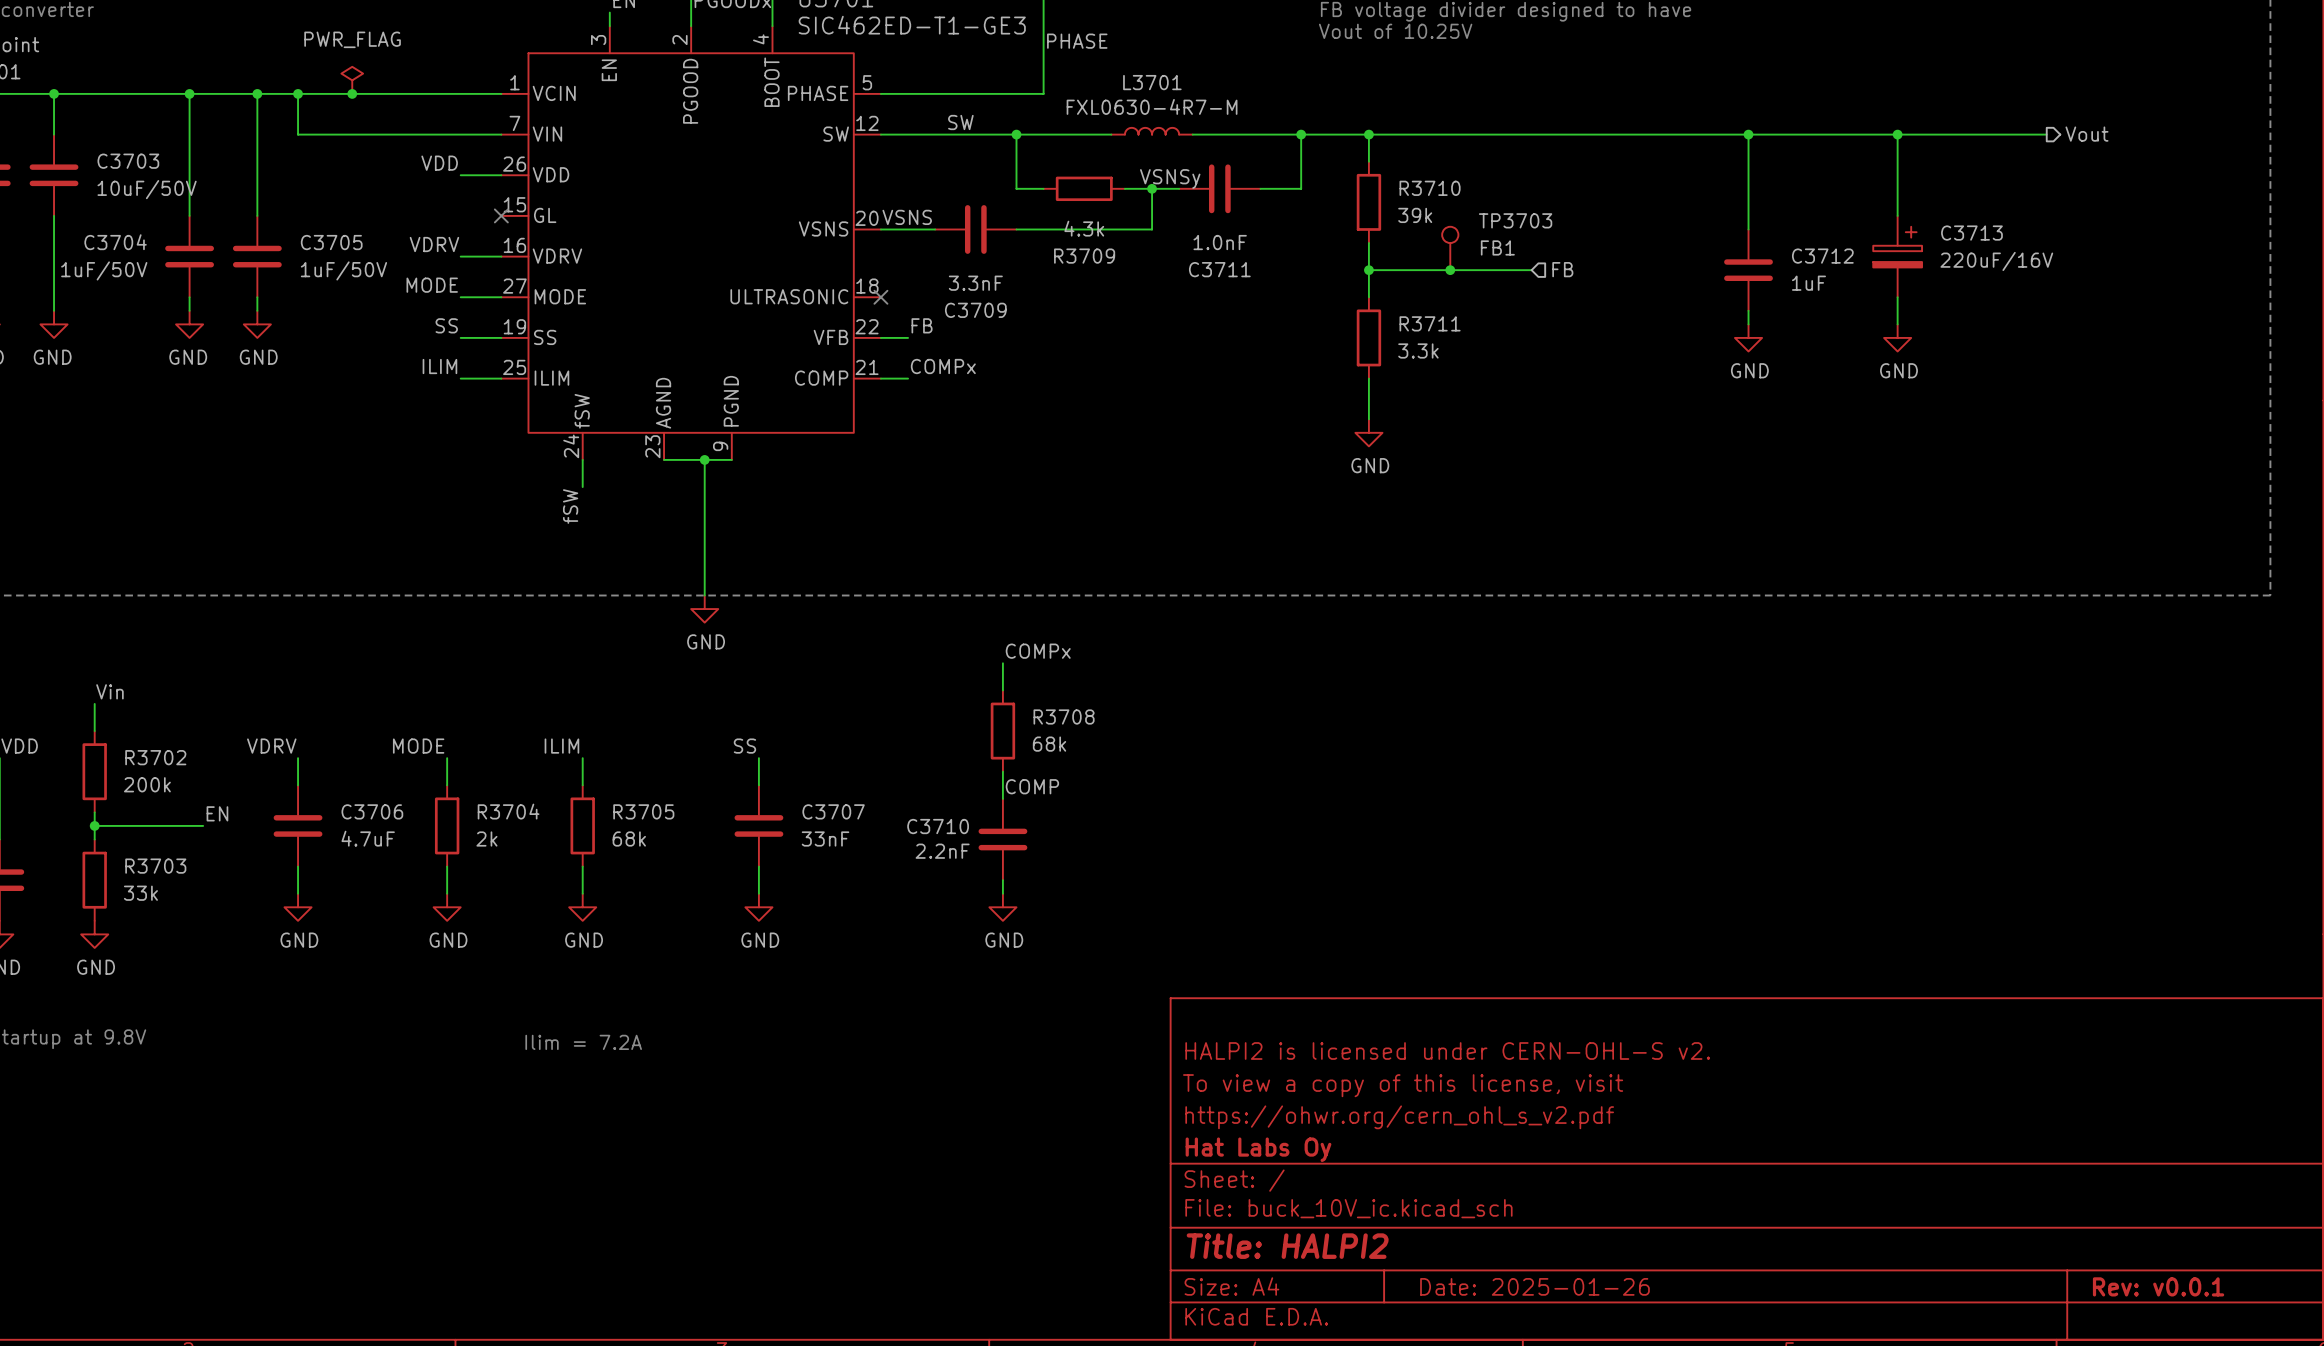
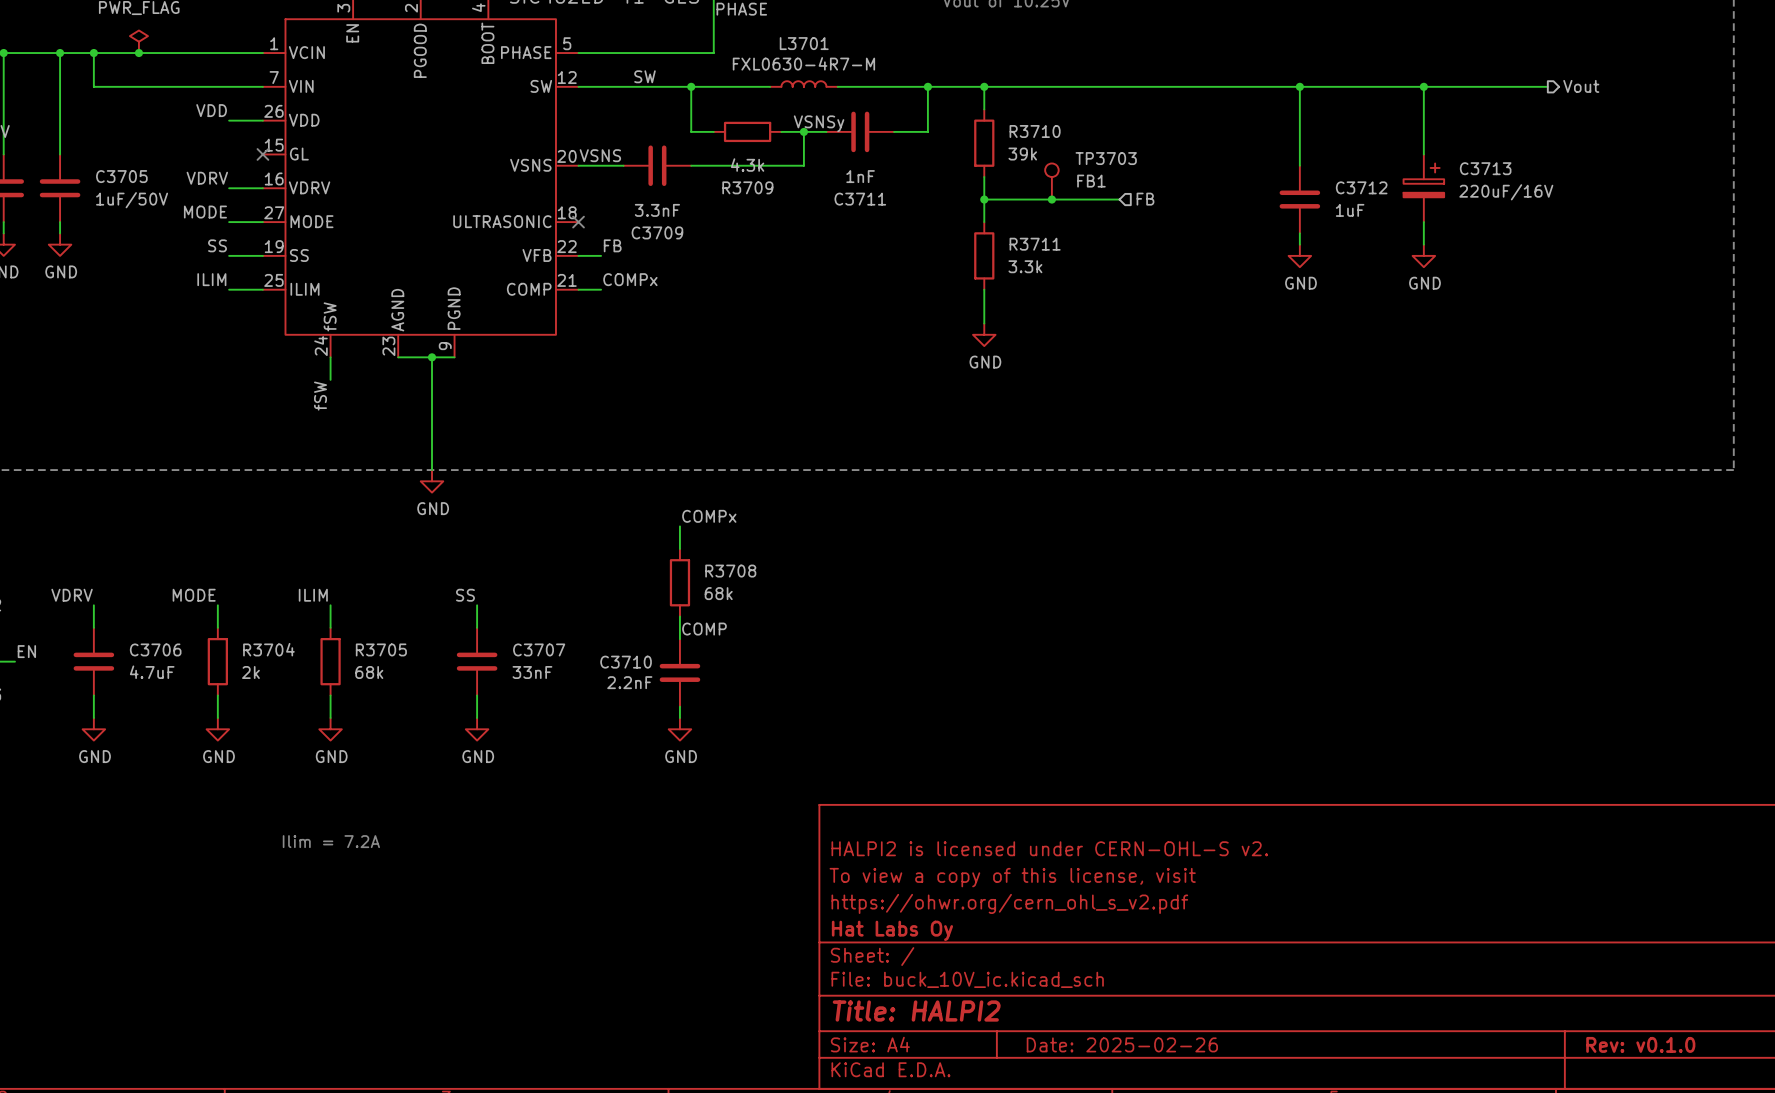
C3711 value: 1.0nF (1220, 242) -> 1nF (860, 176)
title block: Date: 2025-01-26 (1534, 1286) -> Date: 2025-02-26 (1122, 1044)
title block: Rev: v0.0.1 (2158, 1286) -> Rev: v0.1.0 (1640, 1044)

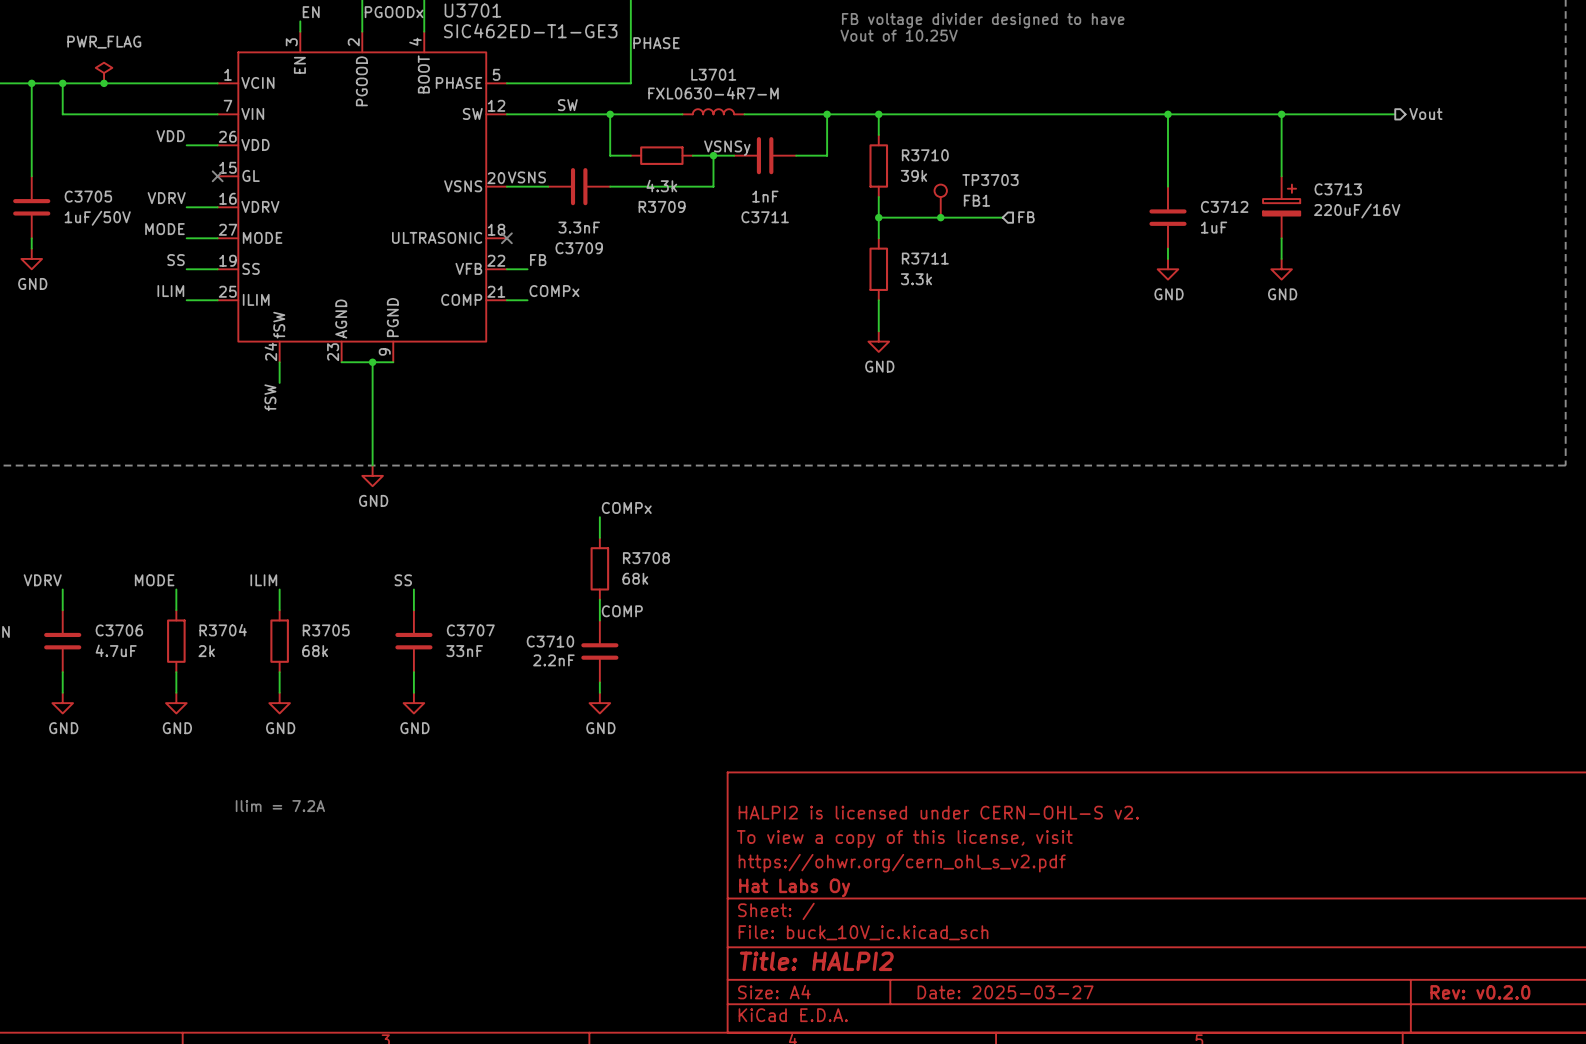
title block: Date: 2025-02-26 (1122, 1044) -> Date: 2025-03-27 (1005, 992)
title block: Rev: v0.1.0 (1640, 1044) -> Rev: v0.2.0 (1480, 992)

